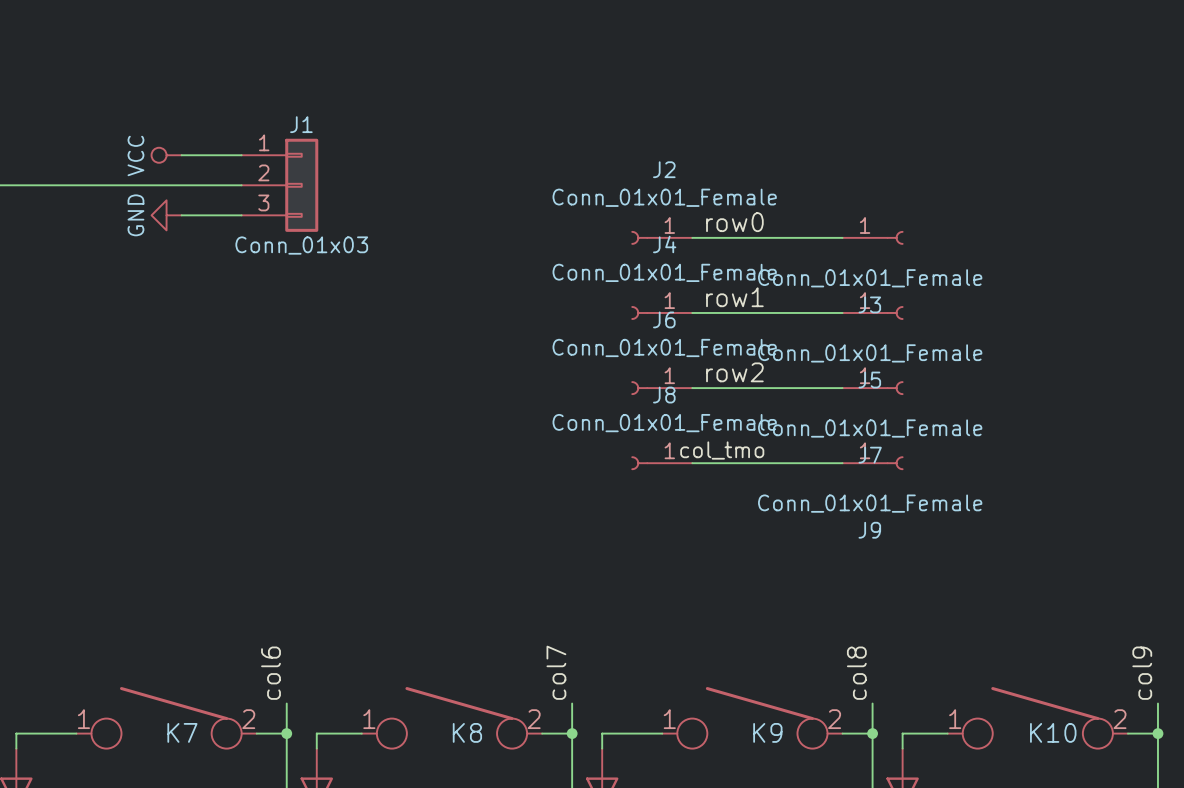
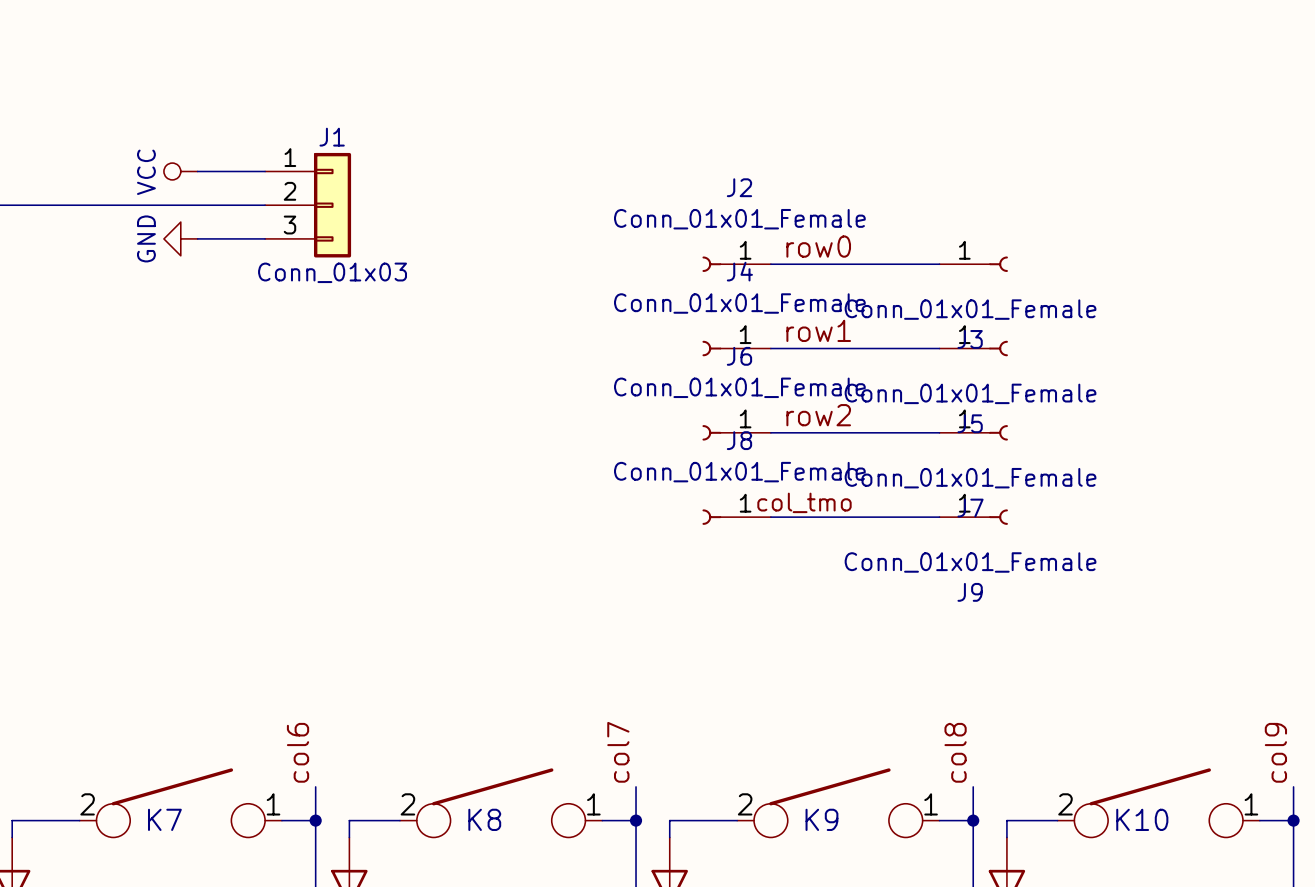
K7 flip: as is (166, 717) -> left-right (180, 802)
K8 flip: as is (451, 717) -> left-right (501, 802)
K9 flip: as is (752, 717) -> left-right (838, 802)
K10 flip: as is (1037, 717) -> left-right (1158, 802)

